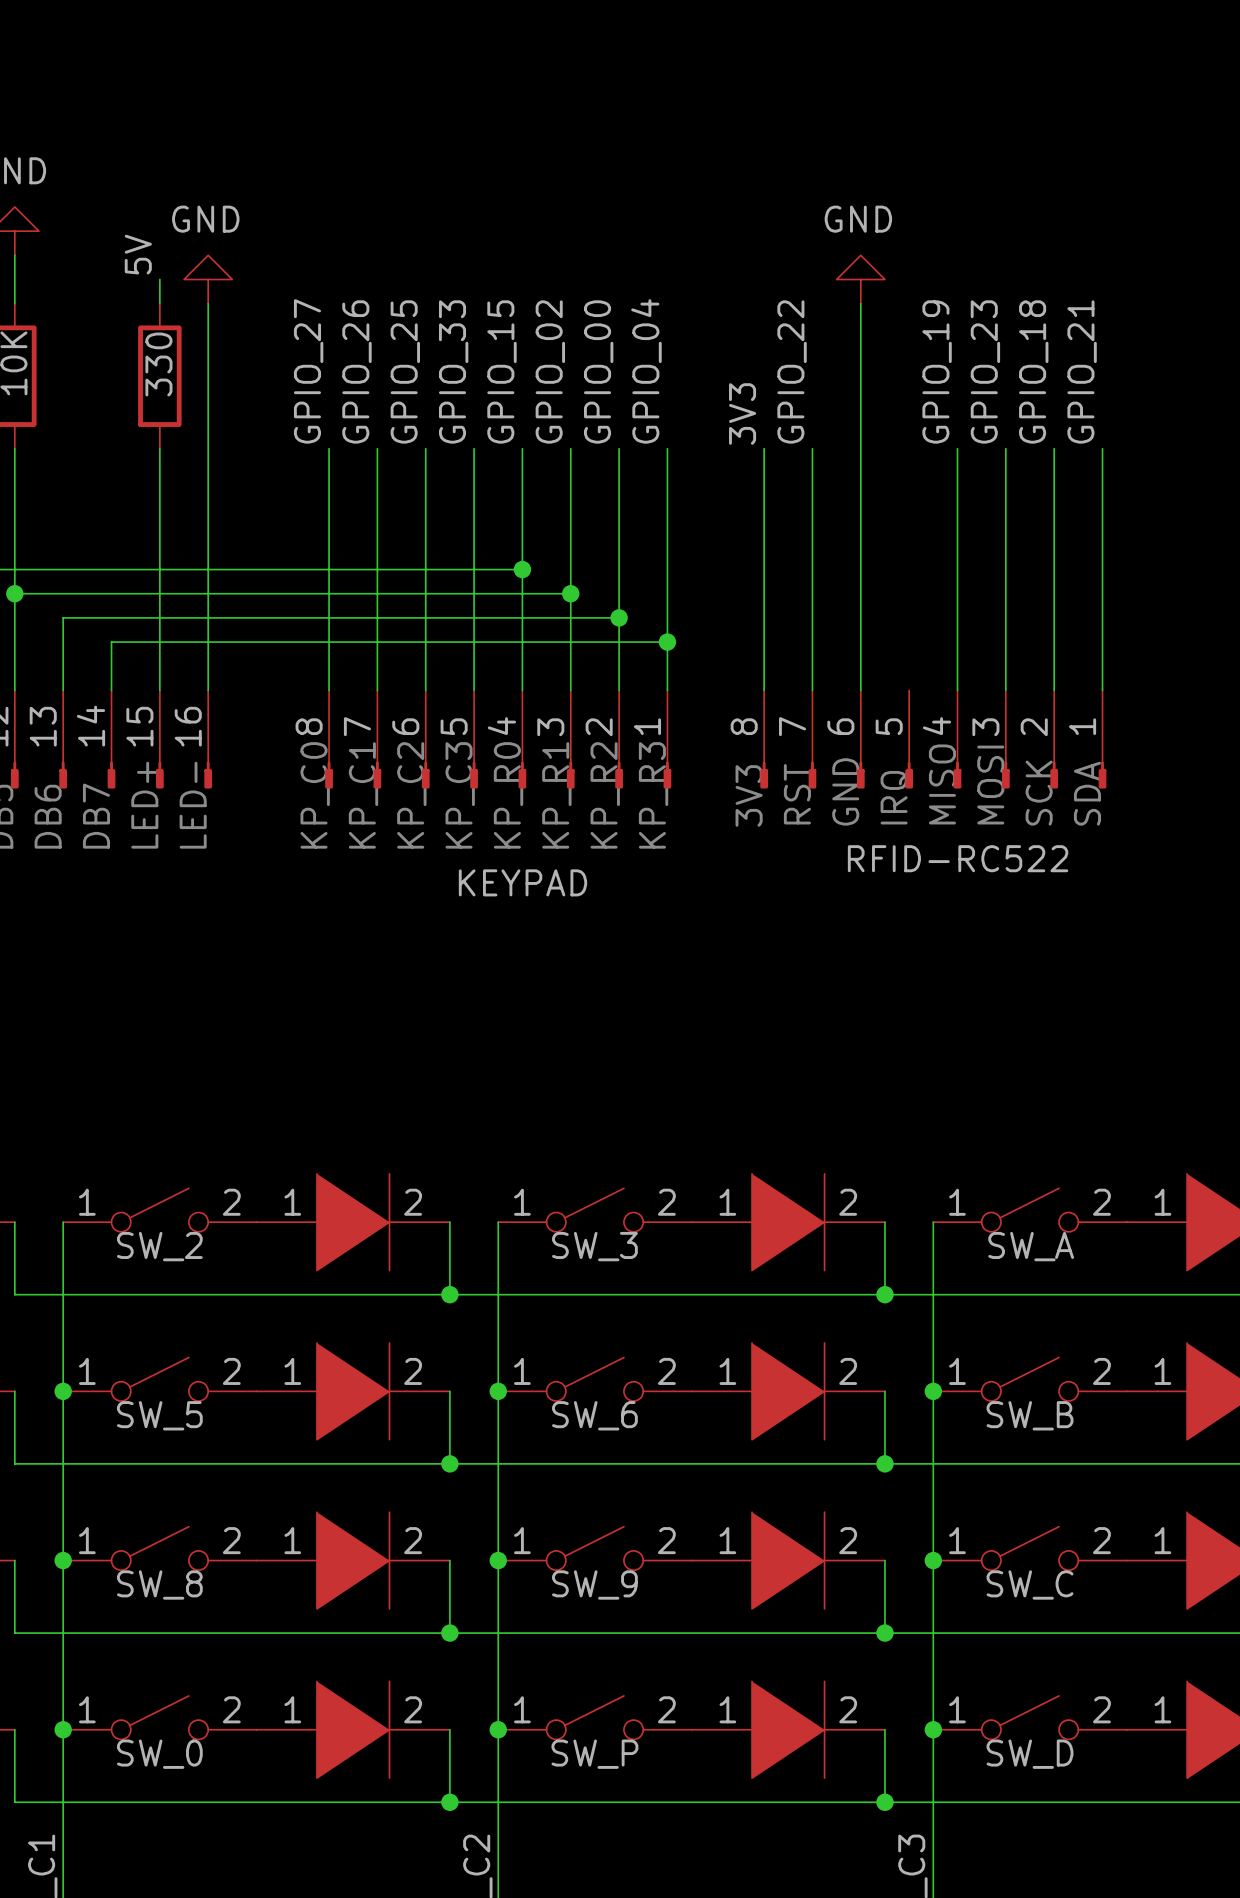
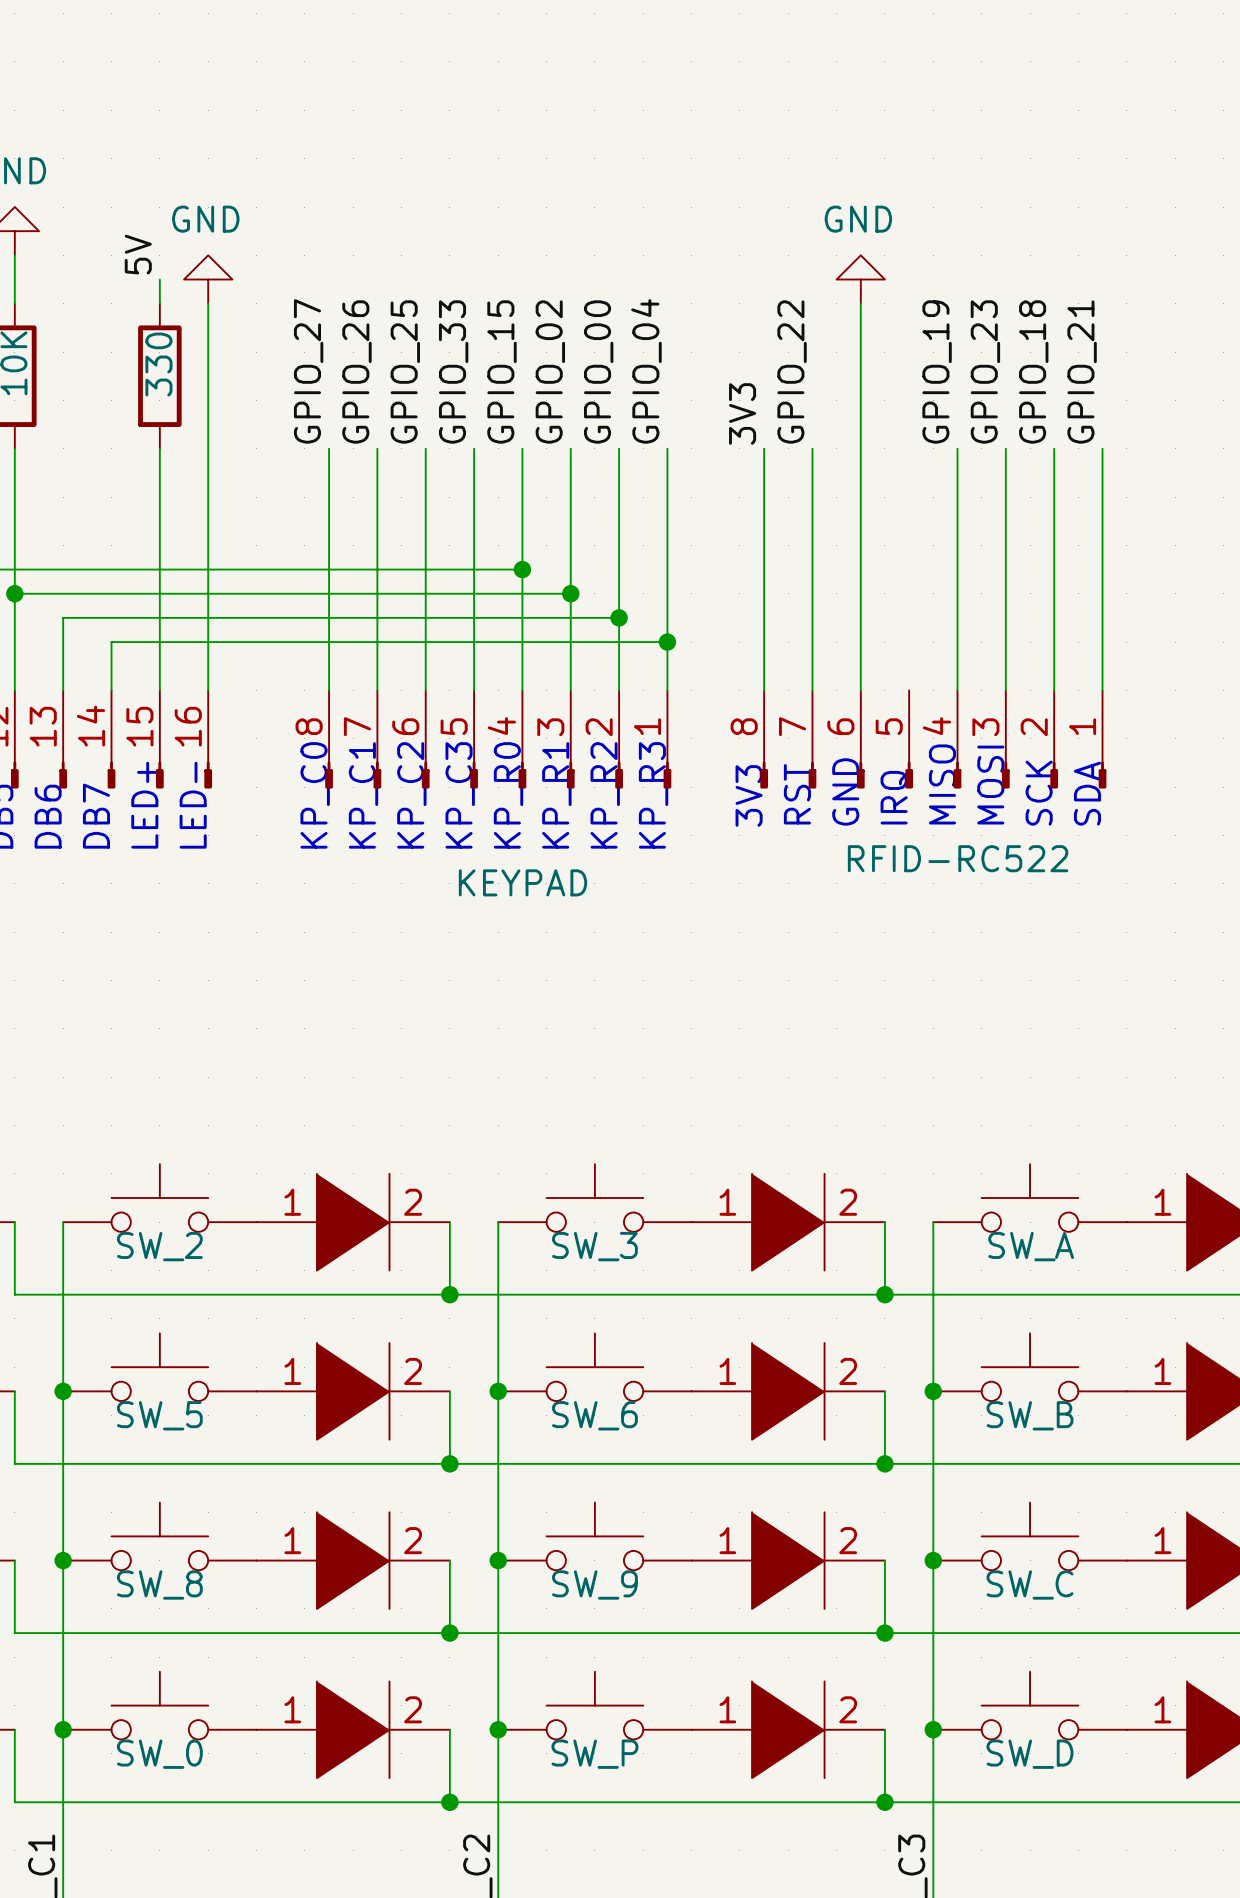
SW_2 symbol: [63, 1188, 257, 1232] -> [63, 1164, 257, 1232]
SW_3 symbol: [498, 1188, 692, 1232] -> [498, 1164, 692, 1232]
SW_A symbol: [933, 1188, 1127, 1232] -> [933, 1164, 1127, 1232]
SW_5 symbol: [63, 1357, 257, 1402] -> [63, 1333, 257, 1402]
SW_6 symbol: [498, 1357, 692, 1402] -> [498, 1333, 692, 1402]
SW_B symbol: [933, 1357, 1127, 1402] -> [933, 1333, 1127, 1402]
SW_8 symbol: [63, 1526, 257, 1571] -> [63, 1502, 257, 1571]
SW_9 symbol: [498, 1526, 692, 1571] -> [498, 1502, 692, 1571]
SW_C symbol: [933, 1526, 1127, 1571] -> [933, 1502, 1127, 1571]
SW_0 symbol: [63, 1695, 257, 1740] -> [63, 1671, 257, 1740]
SW_P symbol: [498, 1695, 692, 1740] -> [498, 1671, 692, 1740]
SW_D symbol: [933, 1695, 1127, 1740] -> [933, 1671, 1127, 1740]

